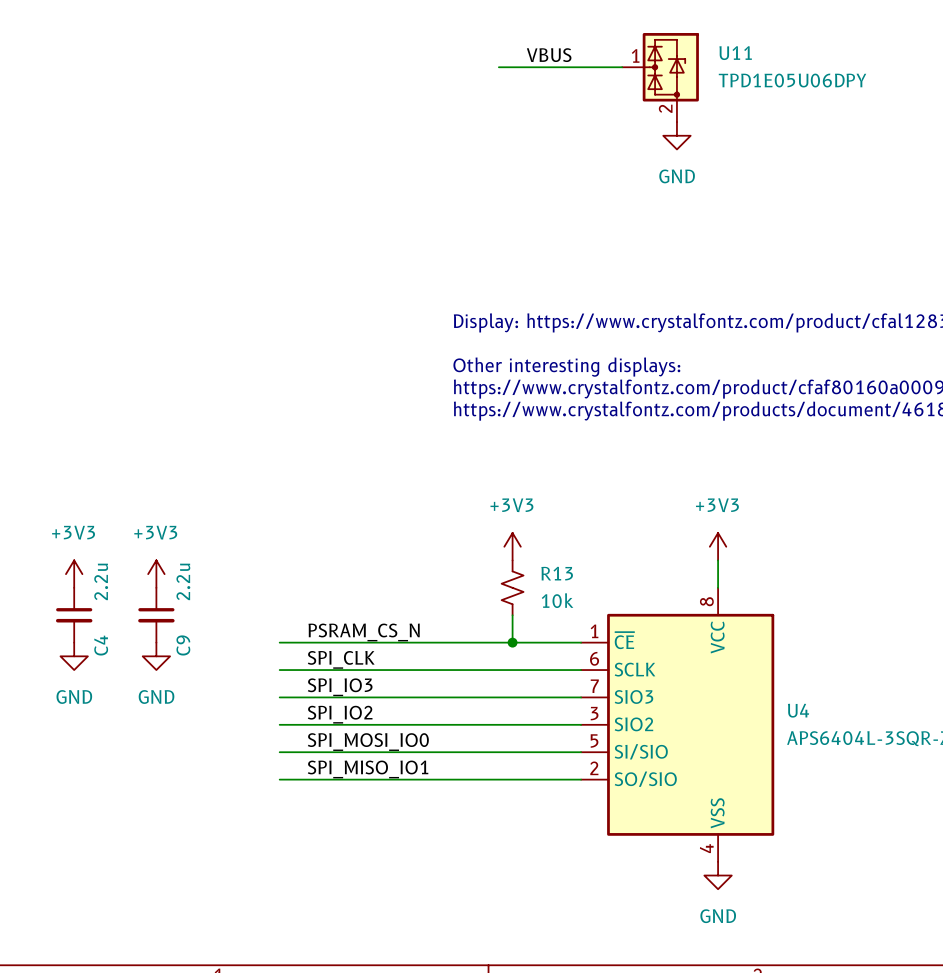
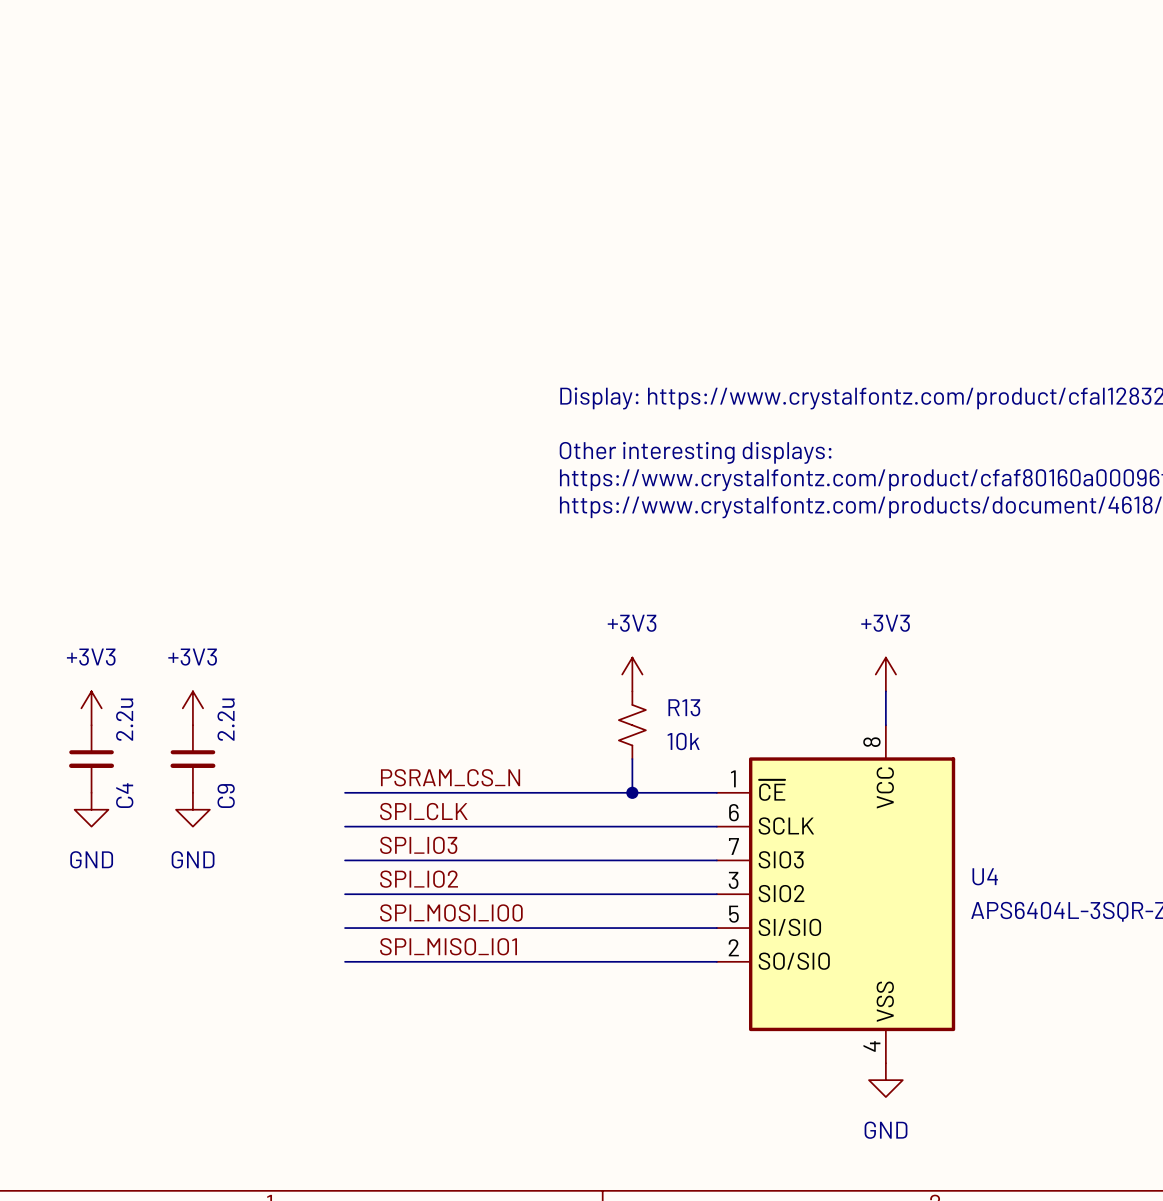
label: VBUS (549, 55) -> none
wire: (498, 67) (622, 67) -> none
U11: TPD1E05U06DPY (660, 77) -> none
power symbol: GND (676, 135) -> none

